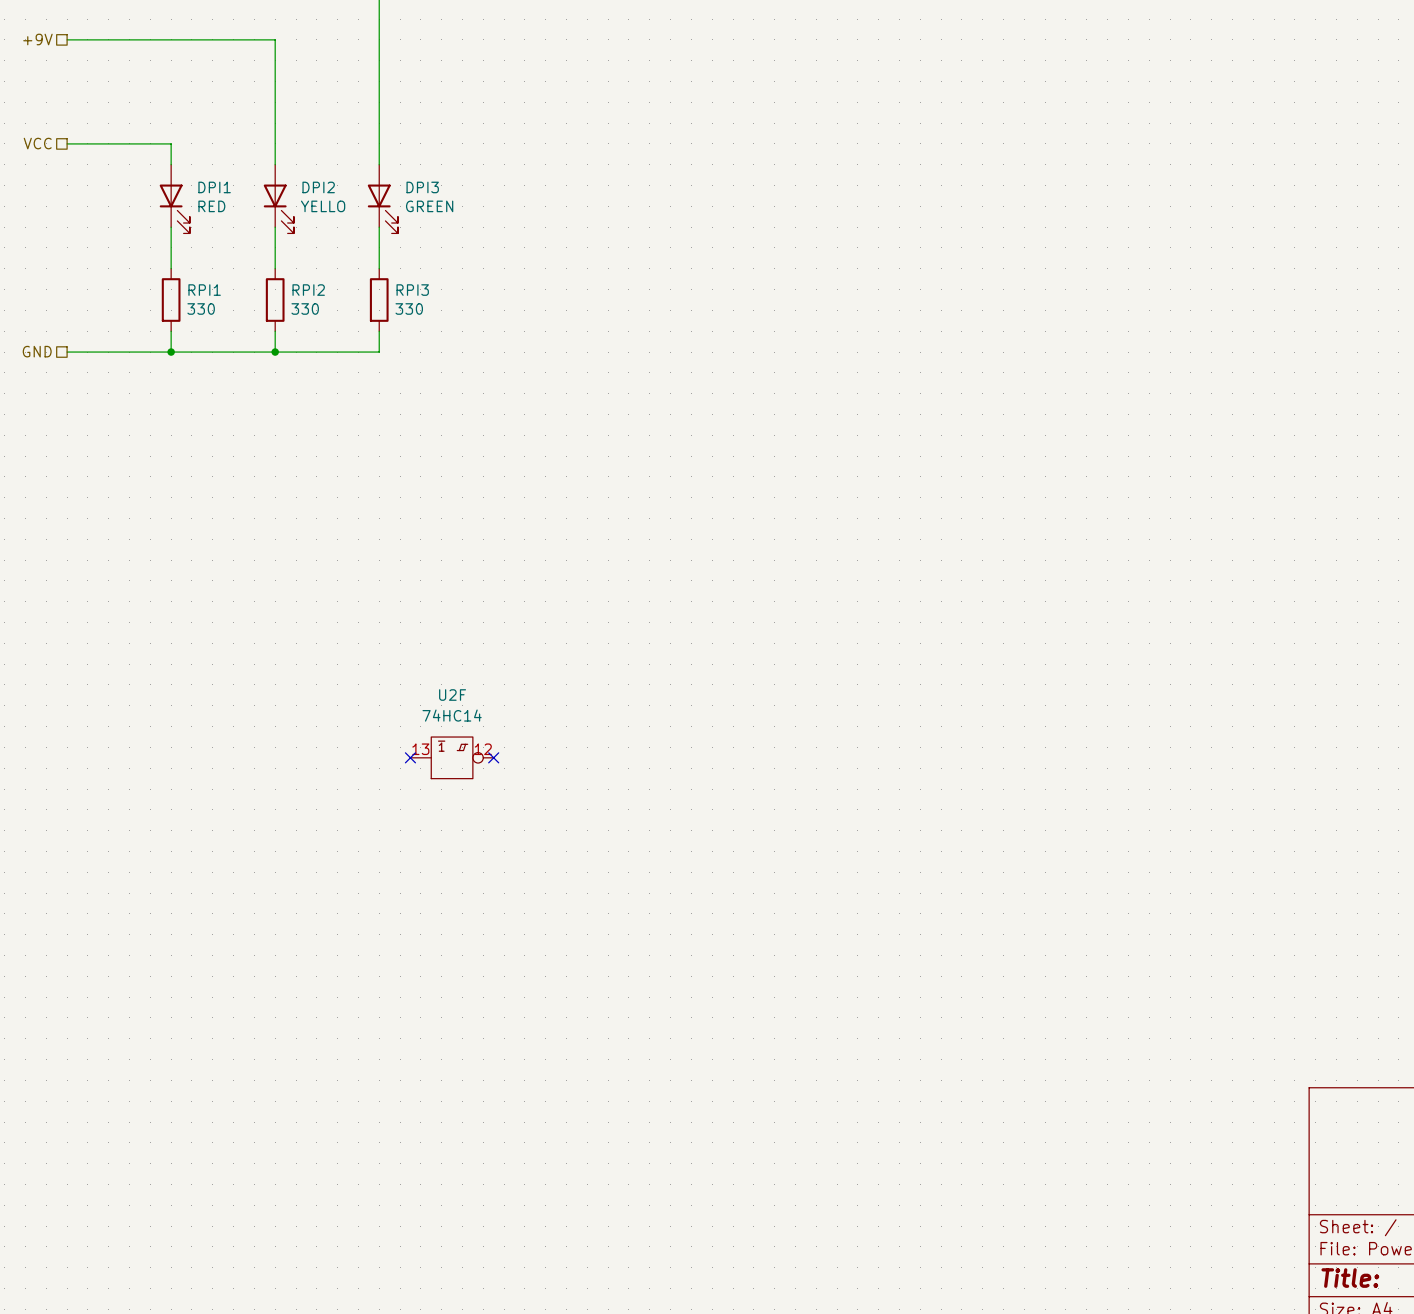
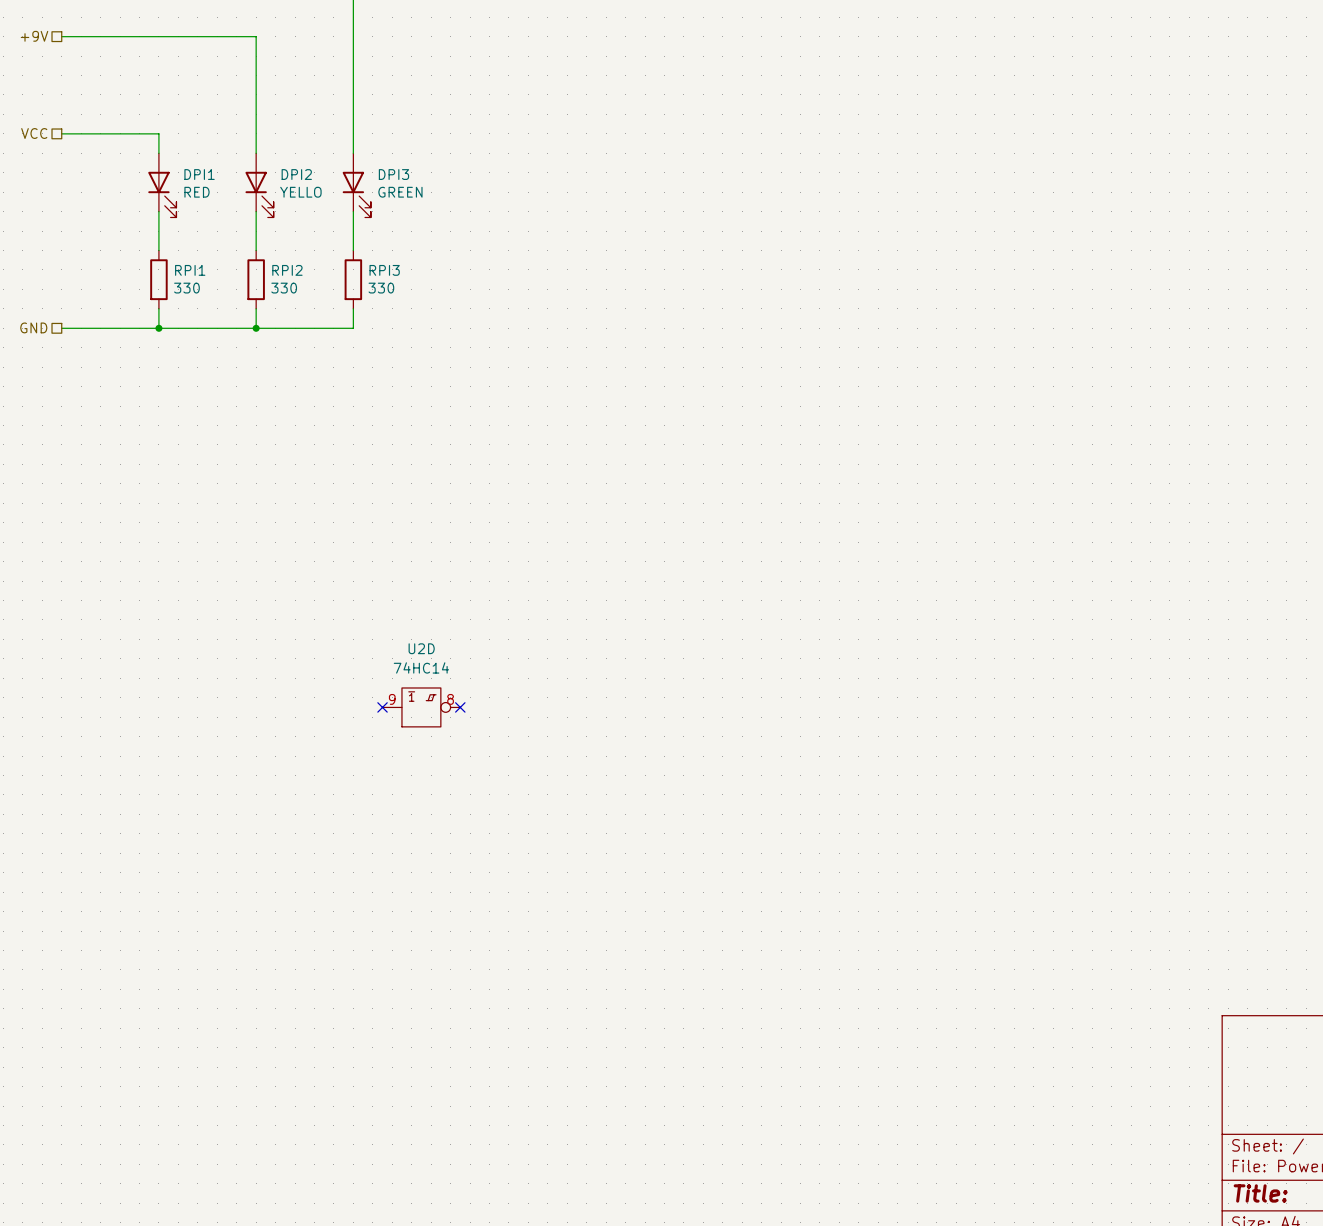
U2F name: U2F (452, 695) -> U2D (421, 648)
U2F pin number: 13 (420, 749) -> 9 (392, 699)
U2F pin number: 12 (483, 749) -> 8 (450, 699)

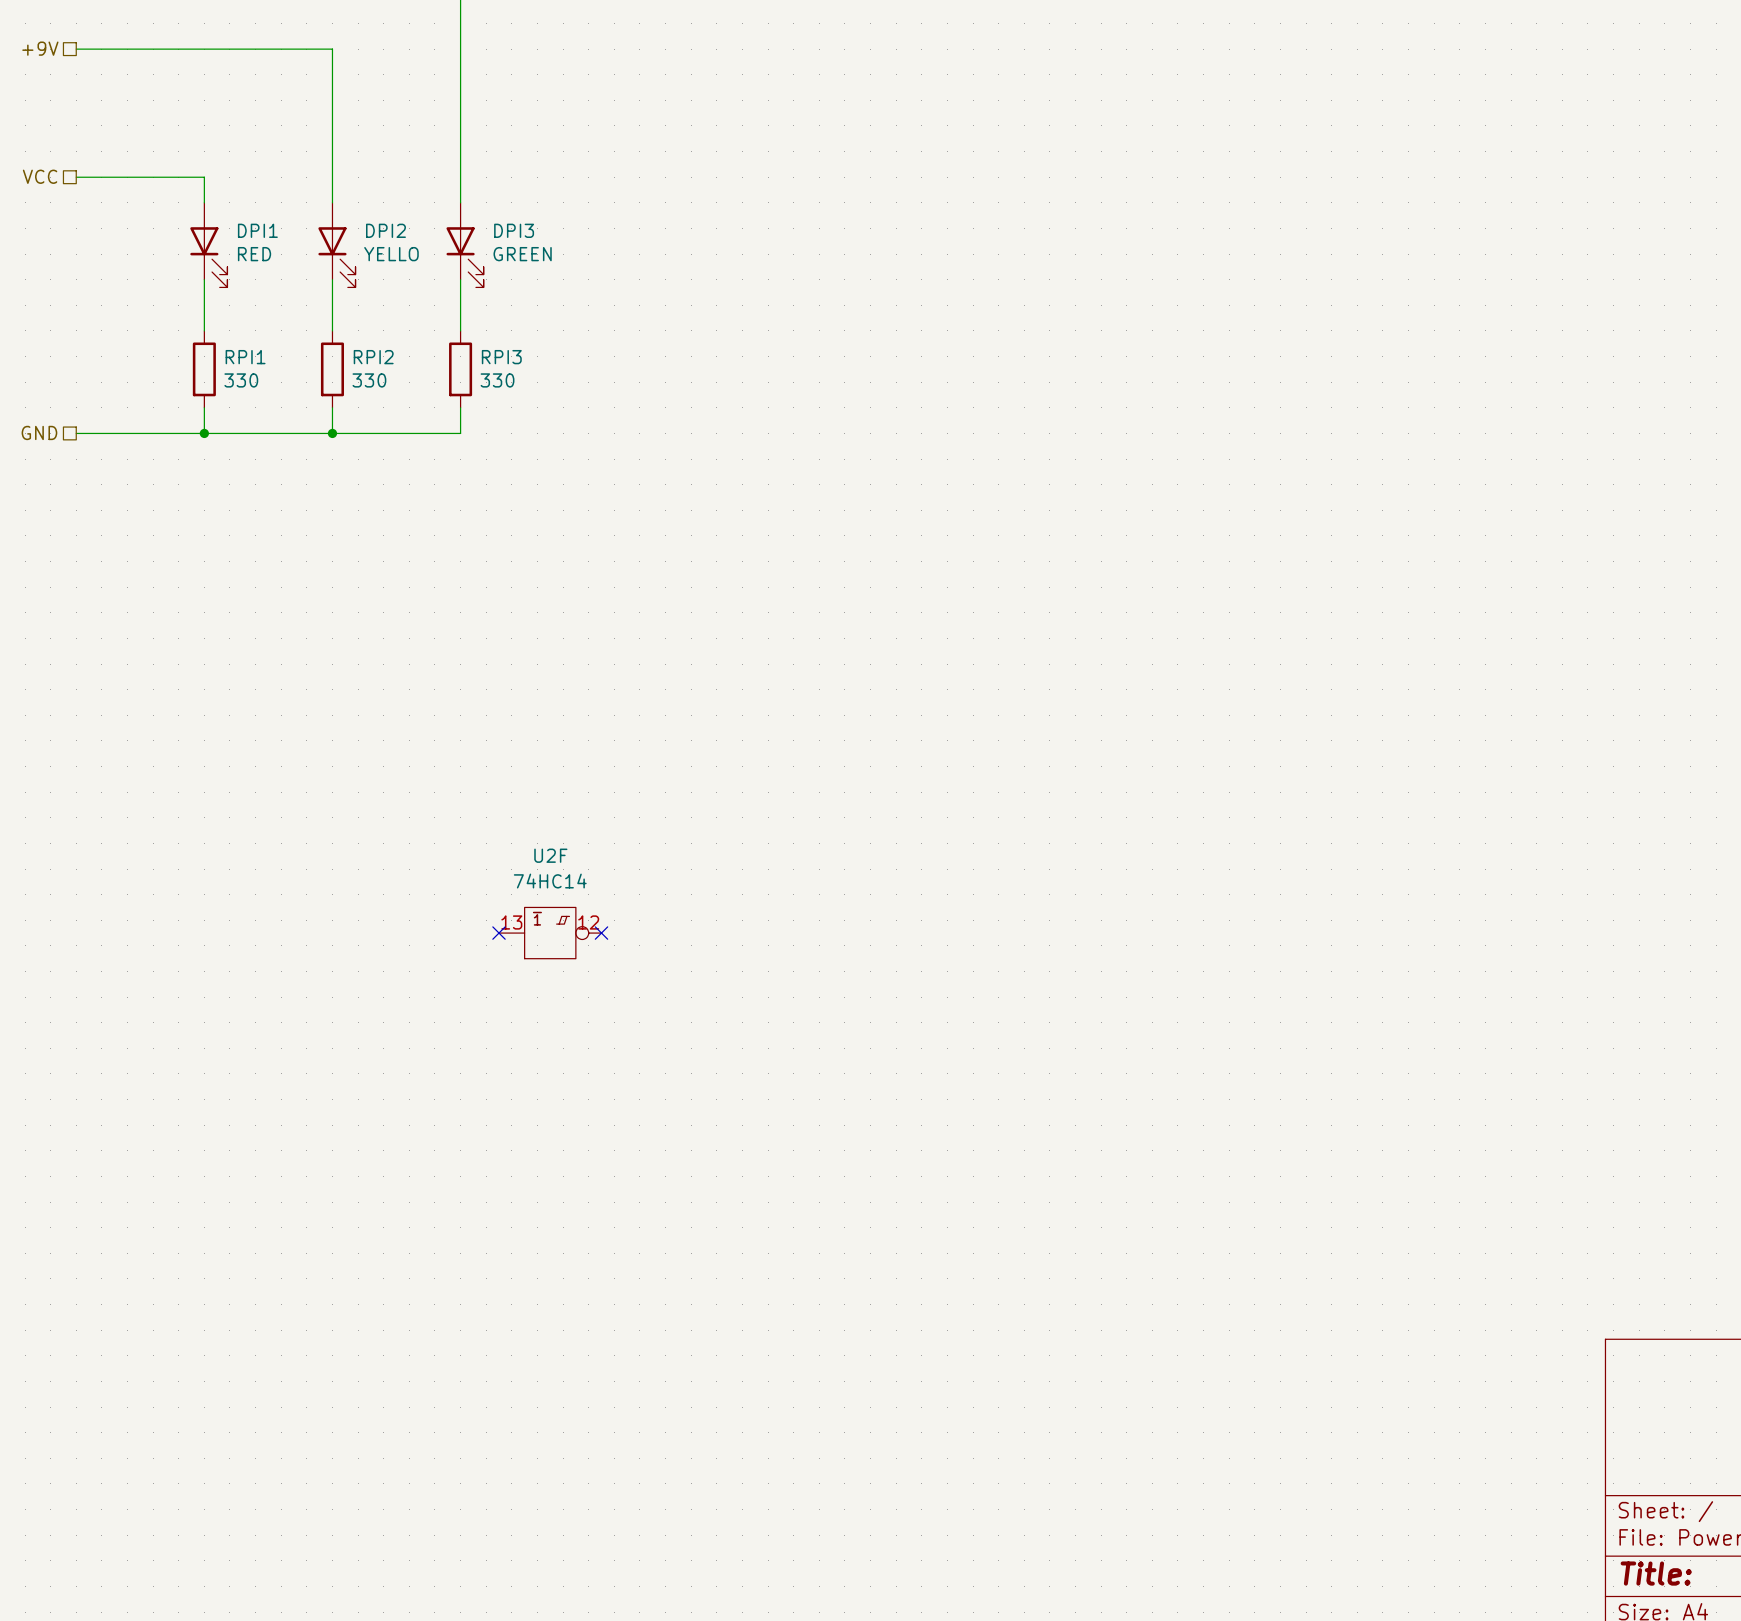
U2D name: U2D (421, 648) -> U2F (550, 855)
U2D pin number: 9 (392, 699) -> 13 (511, 922)
U2D pin number: 8 (450, 699) -> 12 (588, 922)

